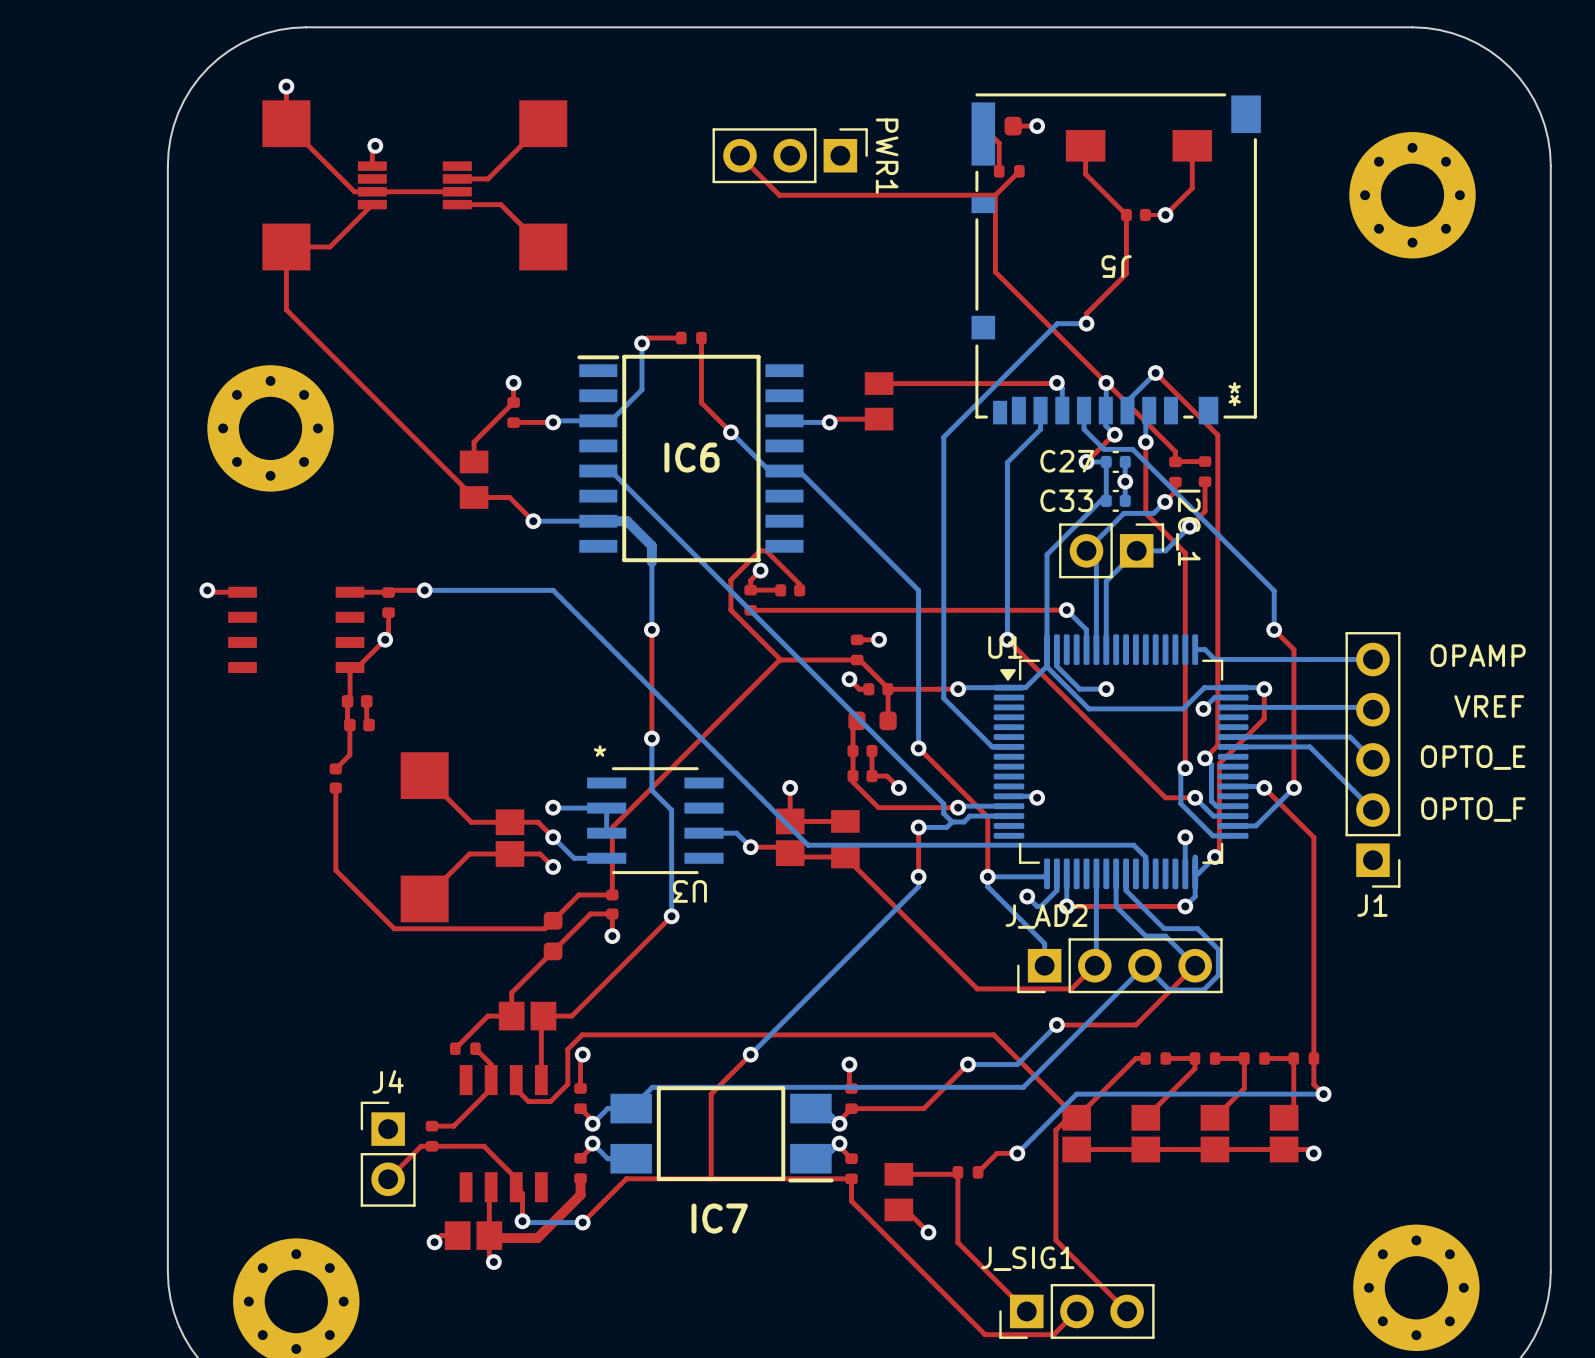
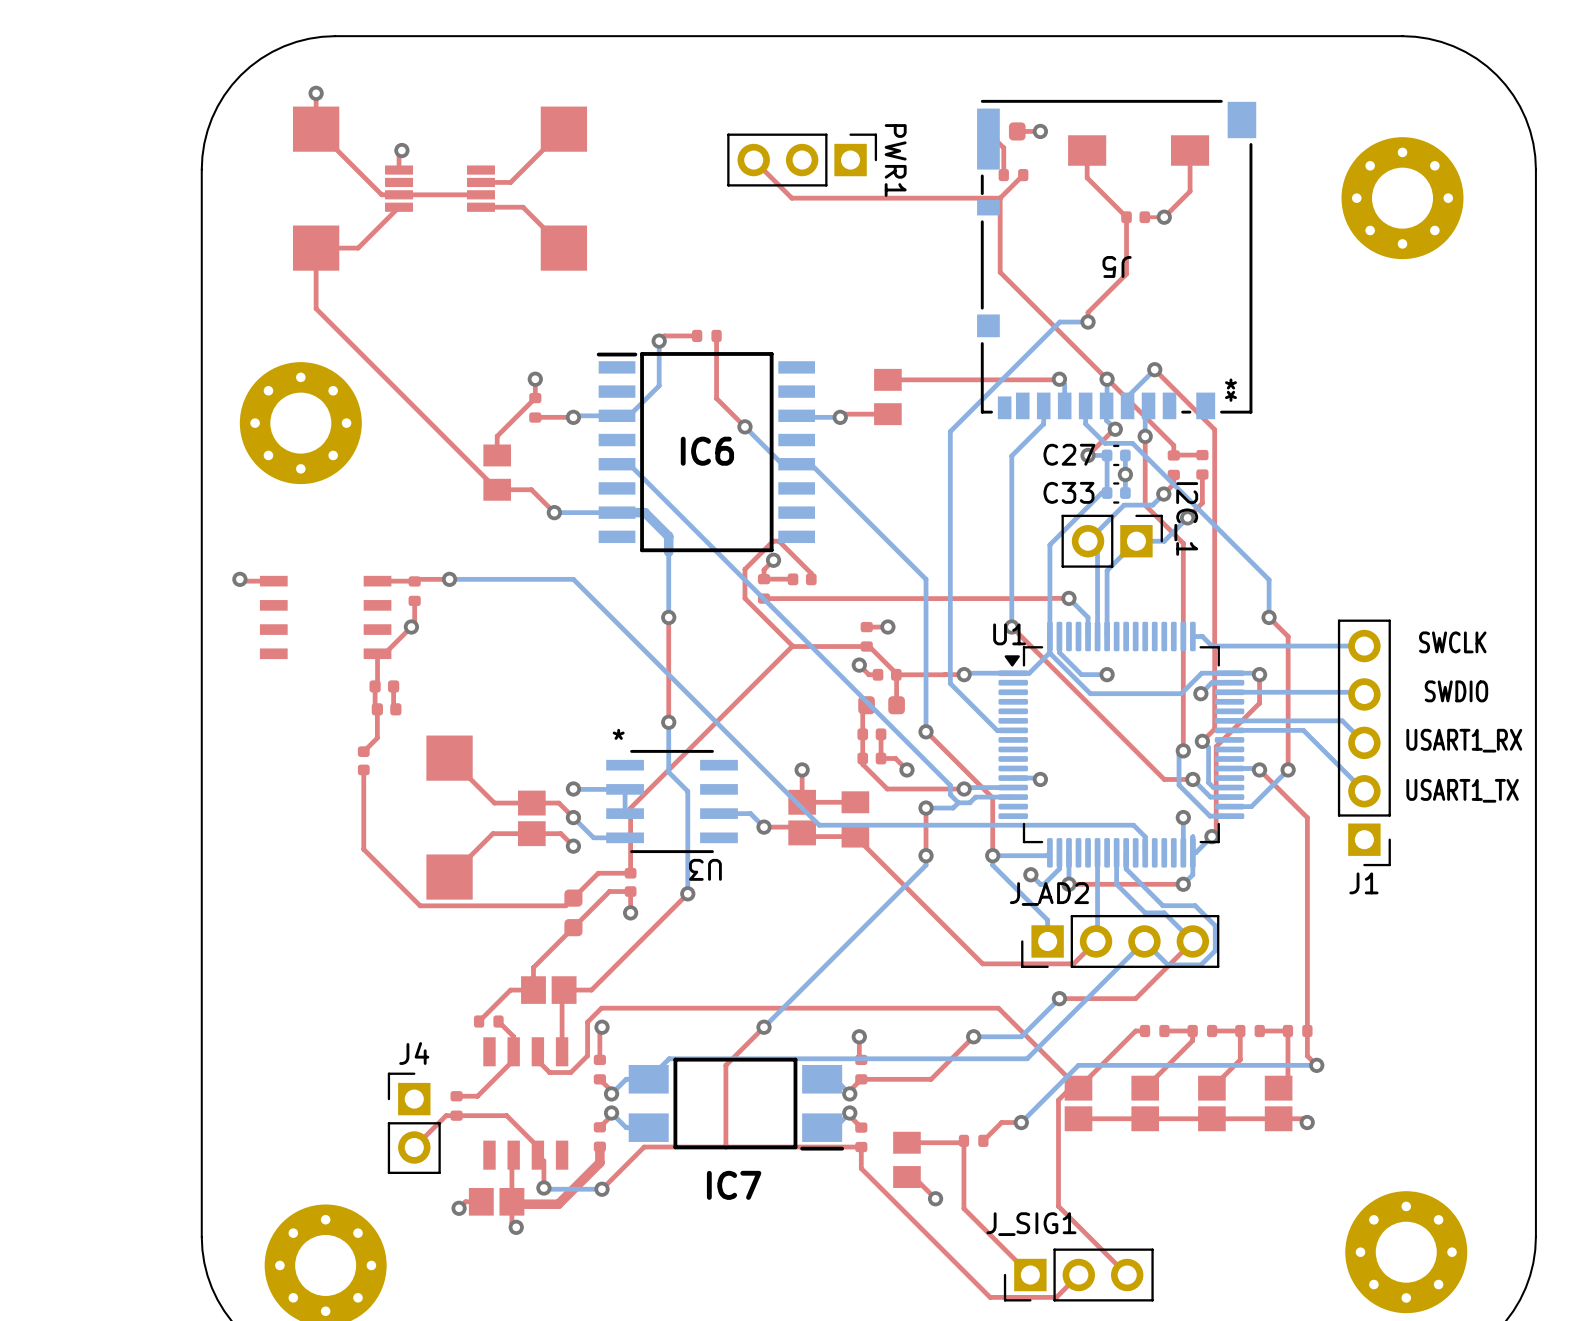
text: OPAMP (1478, 655) -> SWCLK (1452, 642)
text: VREF (1489, 706) -> SWDIO (1456, 691)
text: OPTO_E (1473, 757) -> USART1_RX (1464, 740)
text: OPTO_F (1473, 809) -> USART1_TX (1462, 790)

